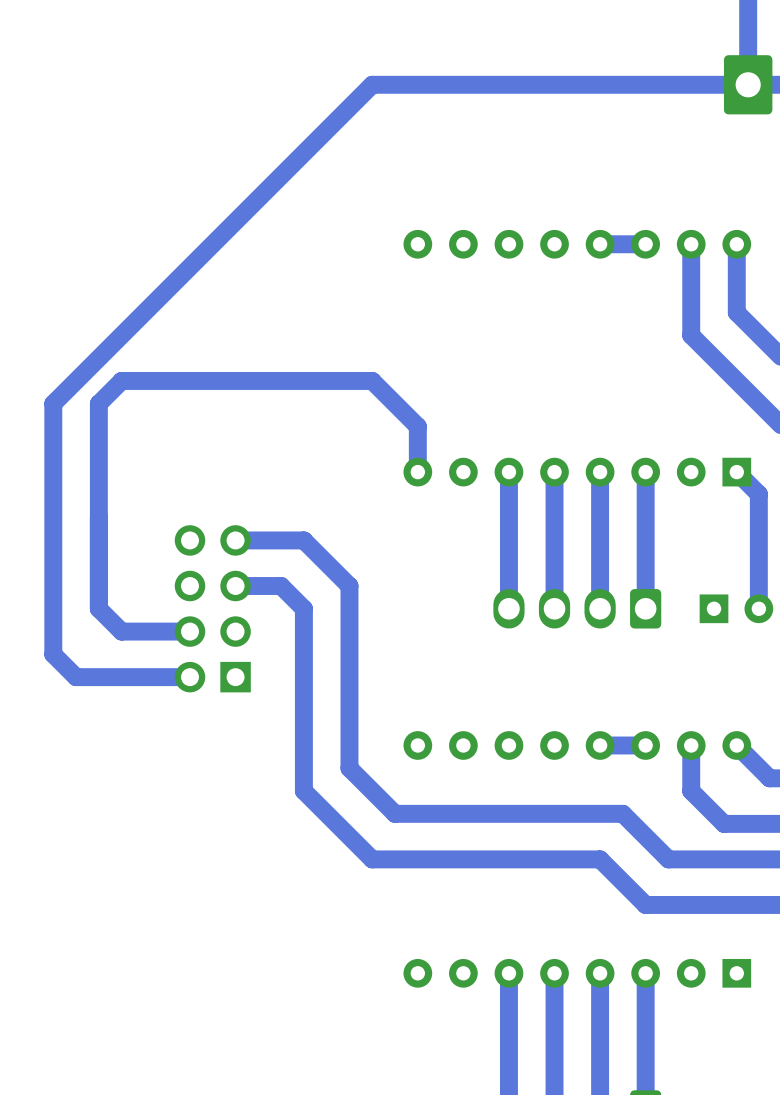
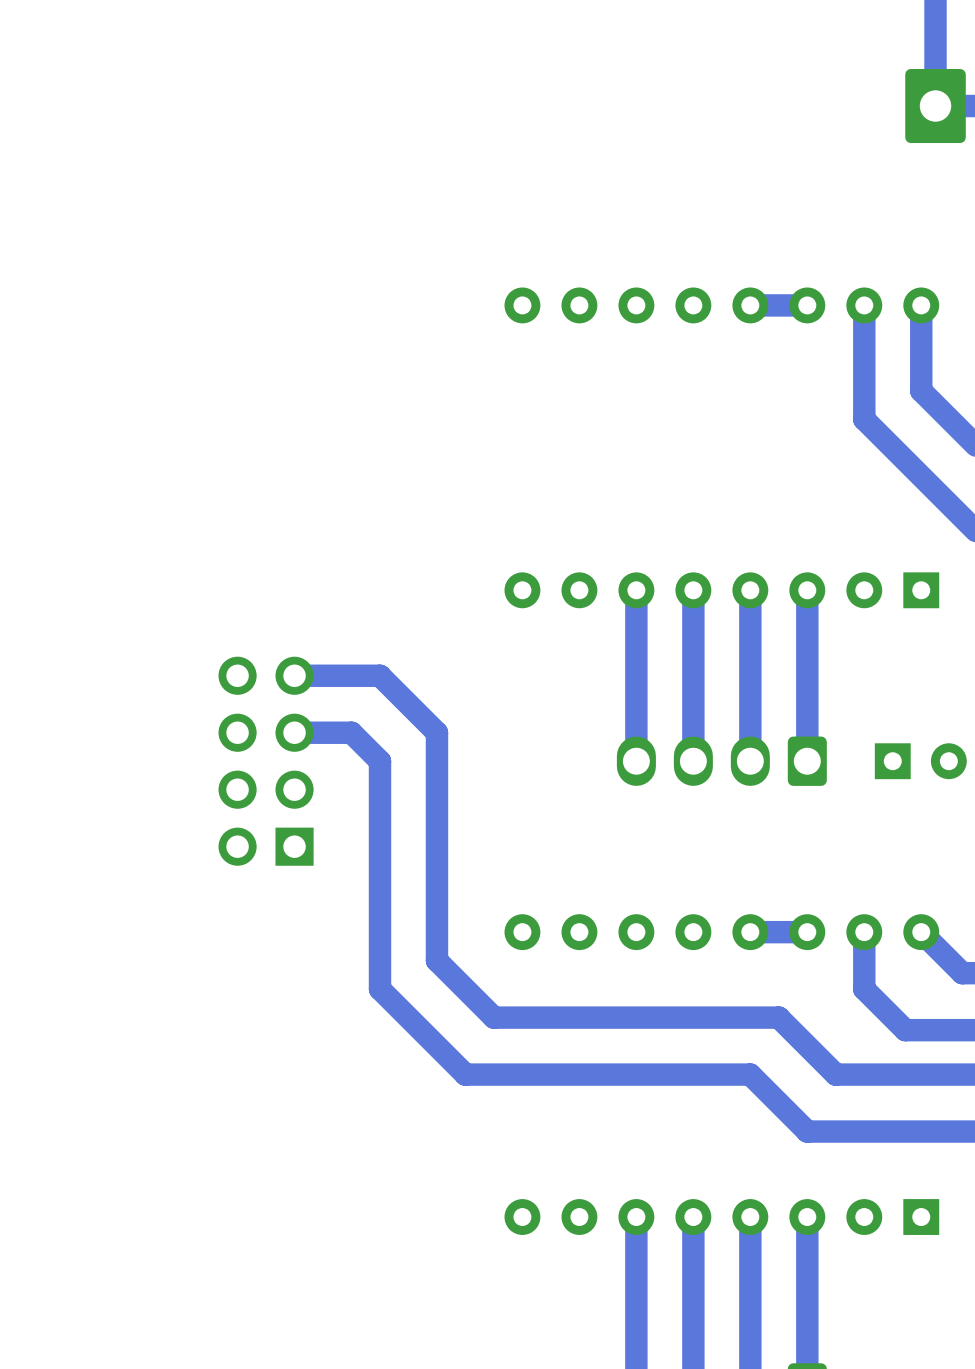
track: (748, 84) (372, 84) (53, 403) (53, 654) (76, 677) (190, 677) -> none
track: (417, 472) (417, 426) (372, 380) (121, 380) (98, 403) (98, 608) (121, 631) (190, 631) -> none
track: (736, 472) (758, 494) (758, 608) -> none

